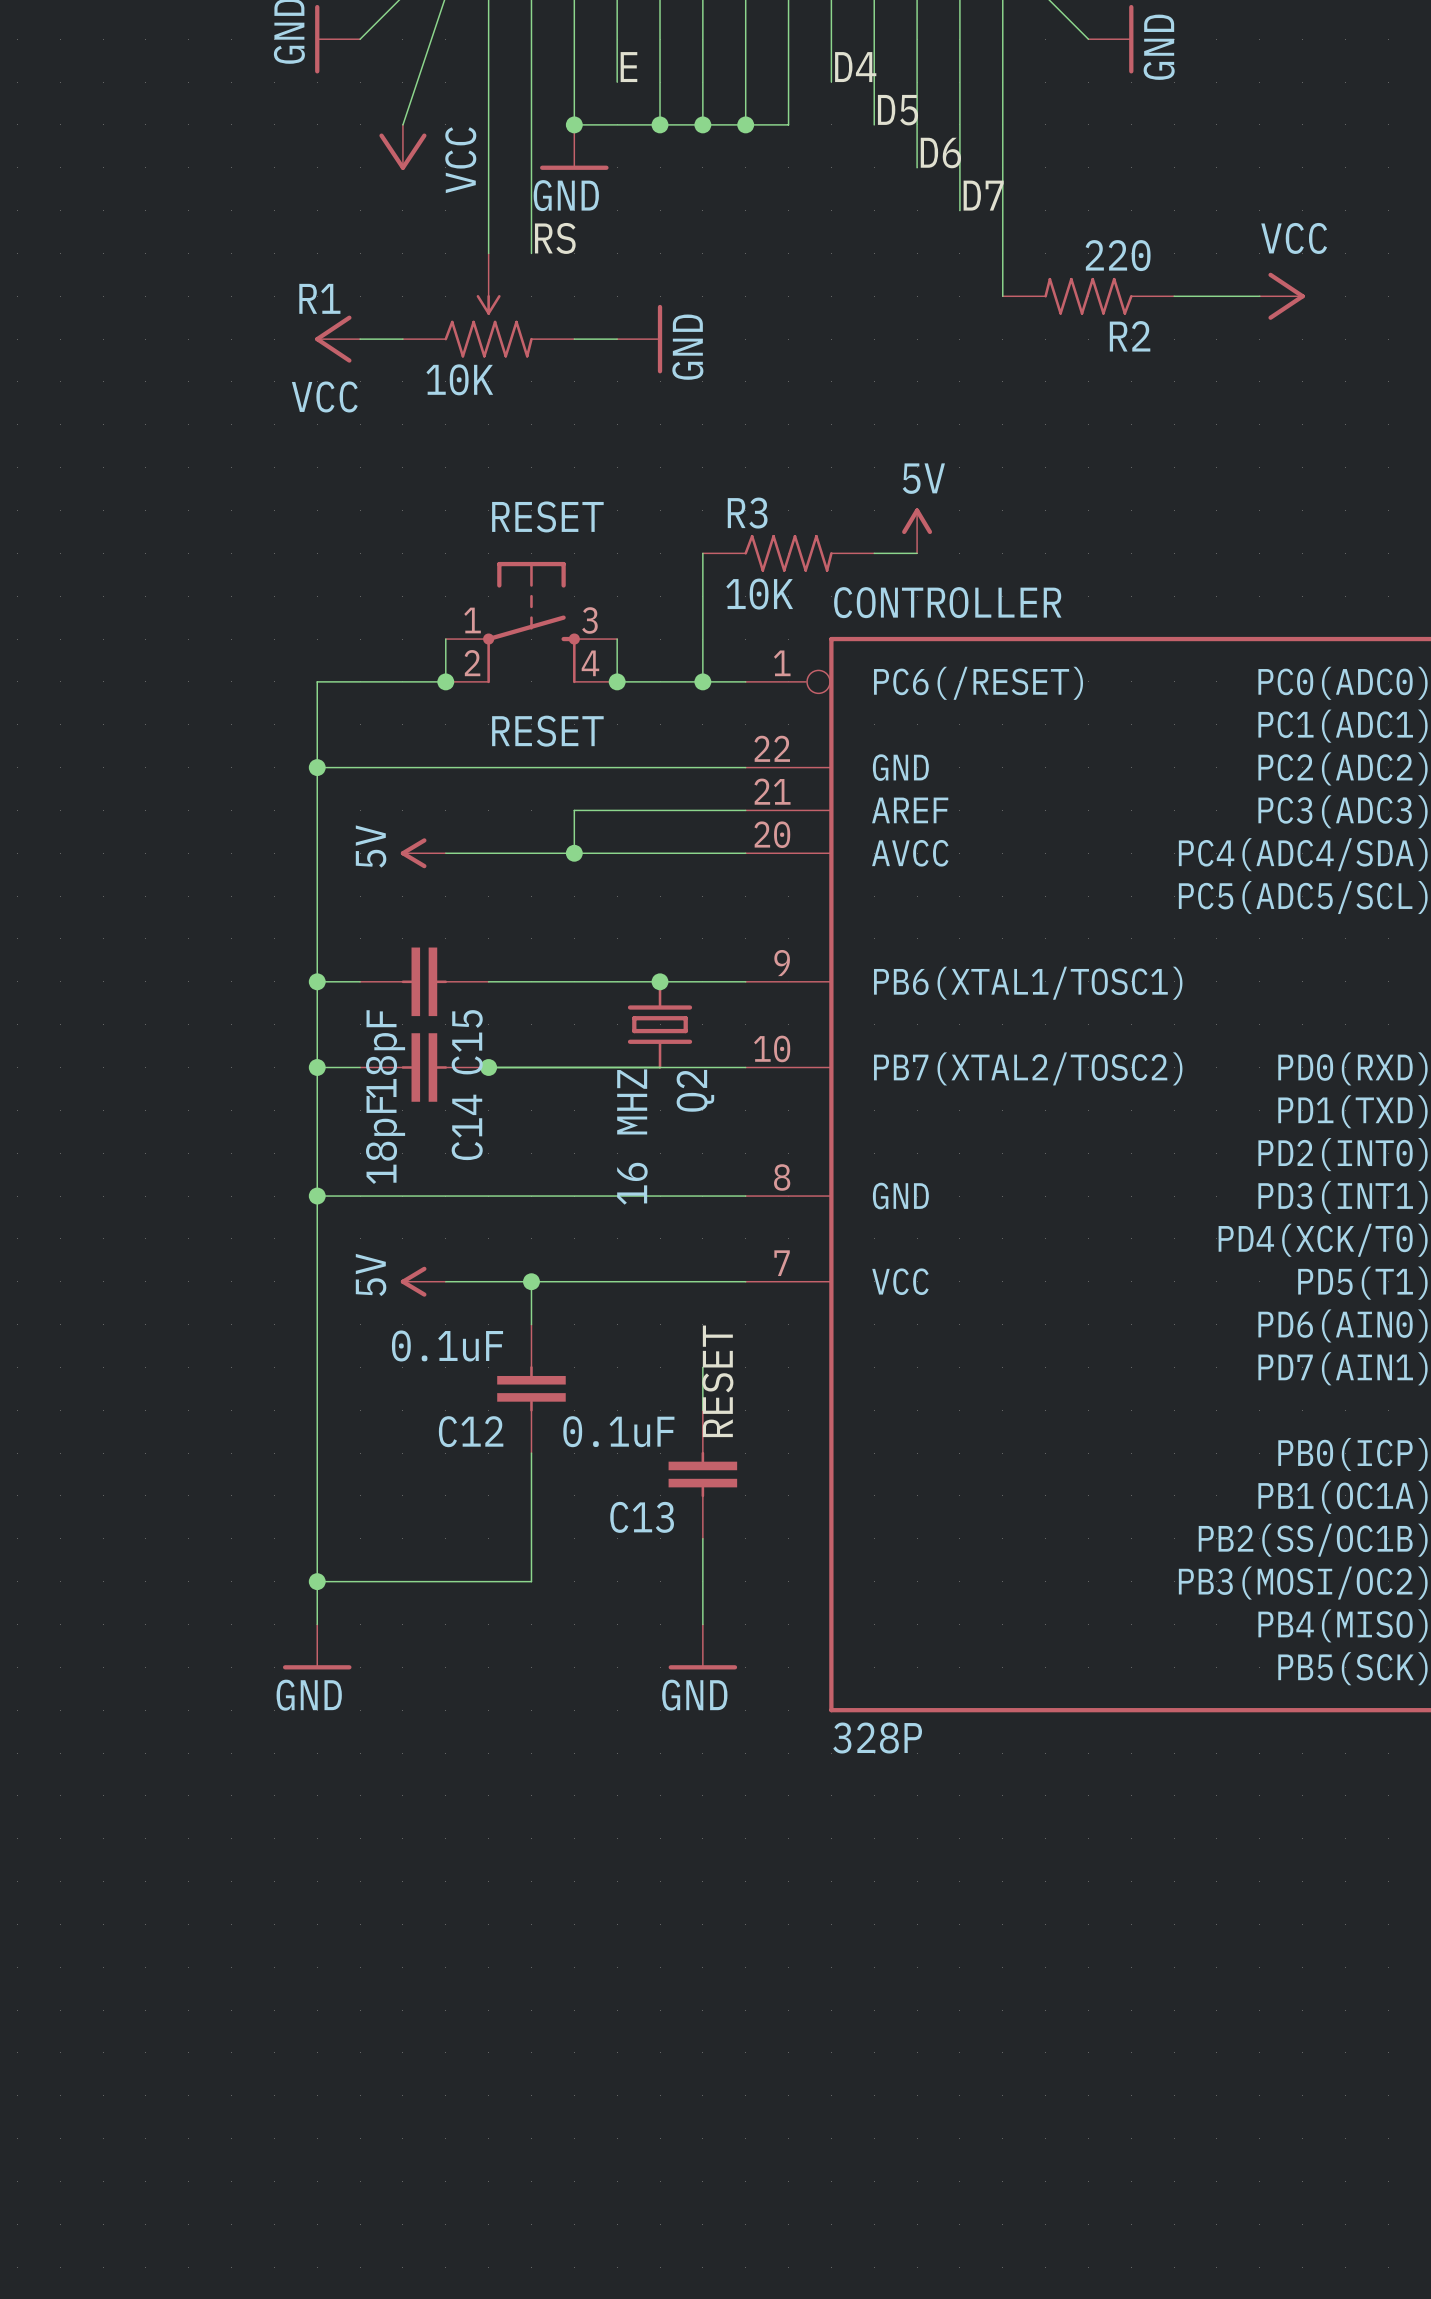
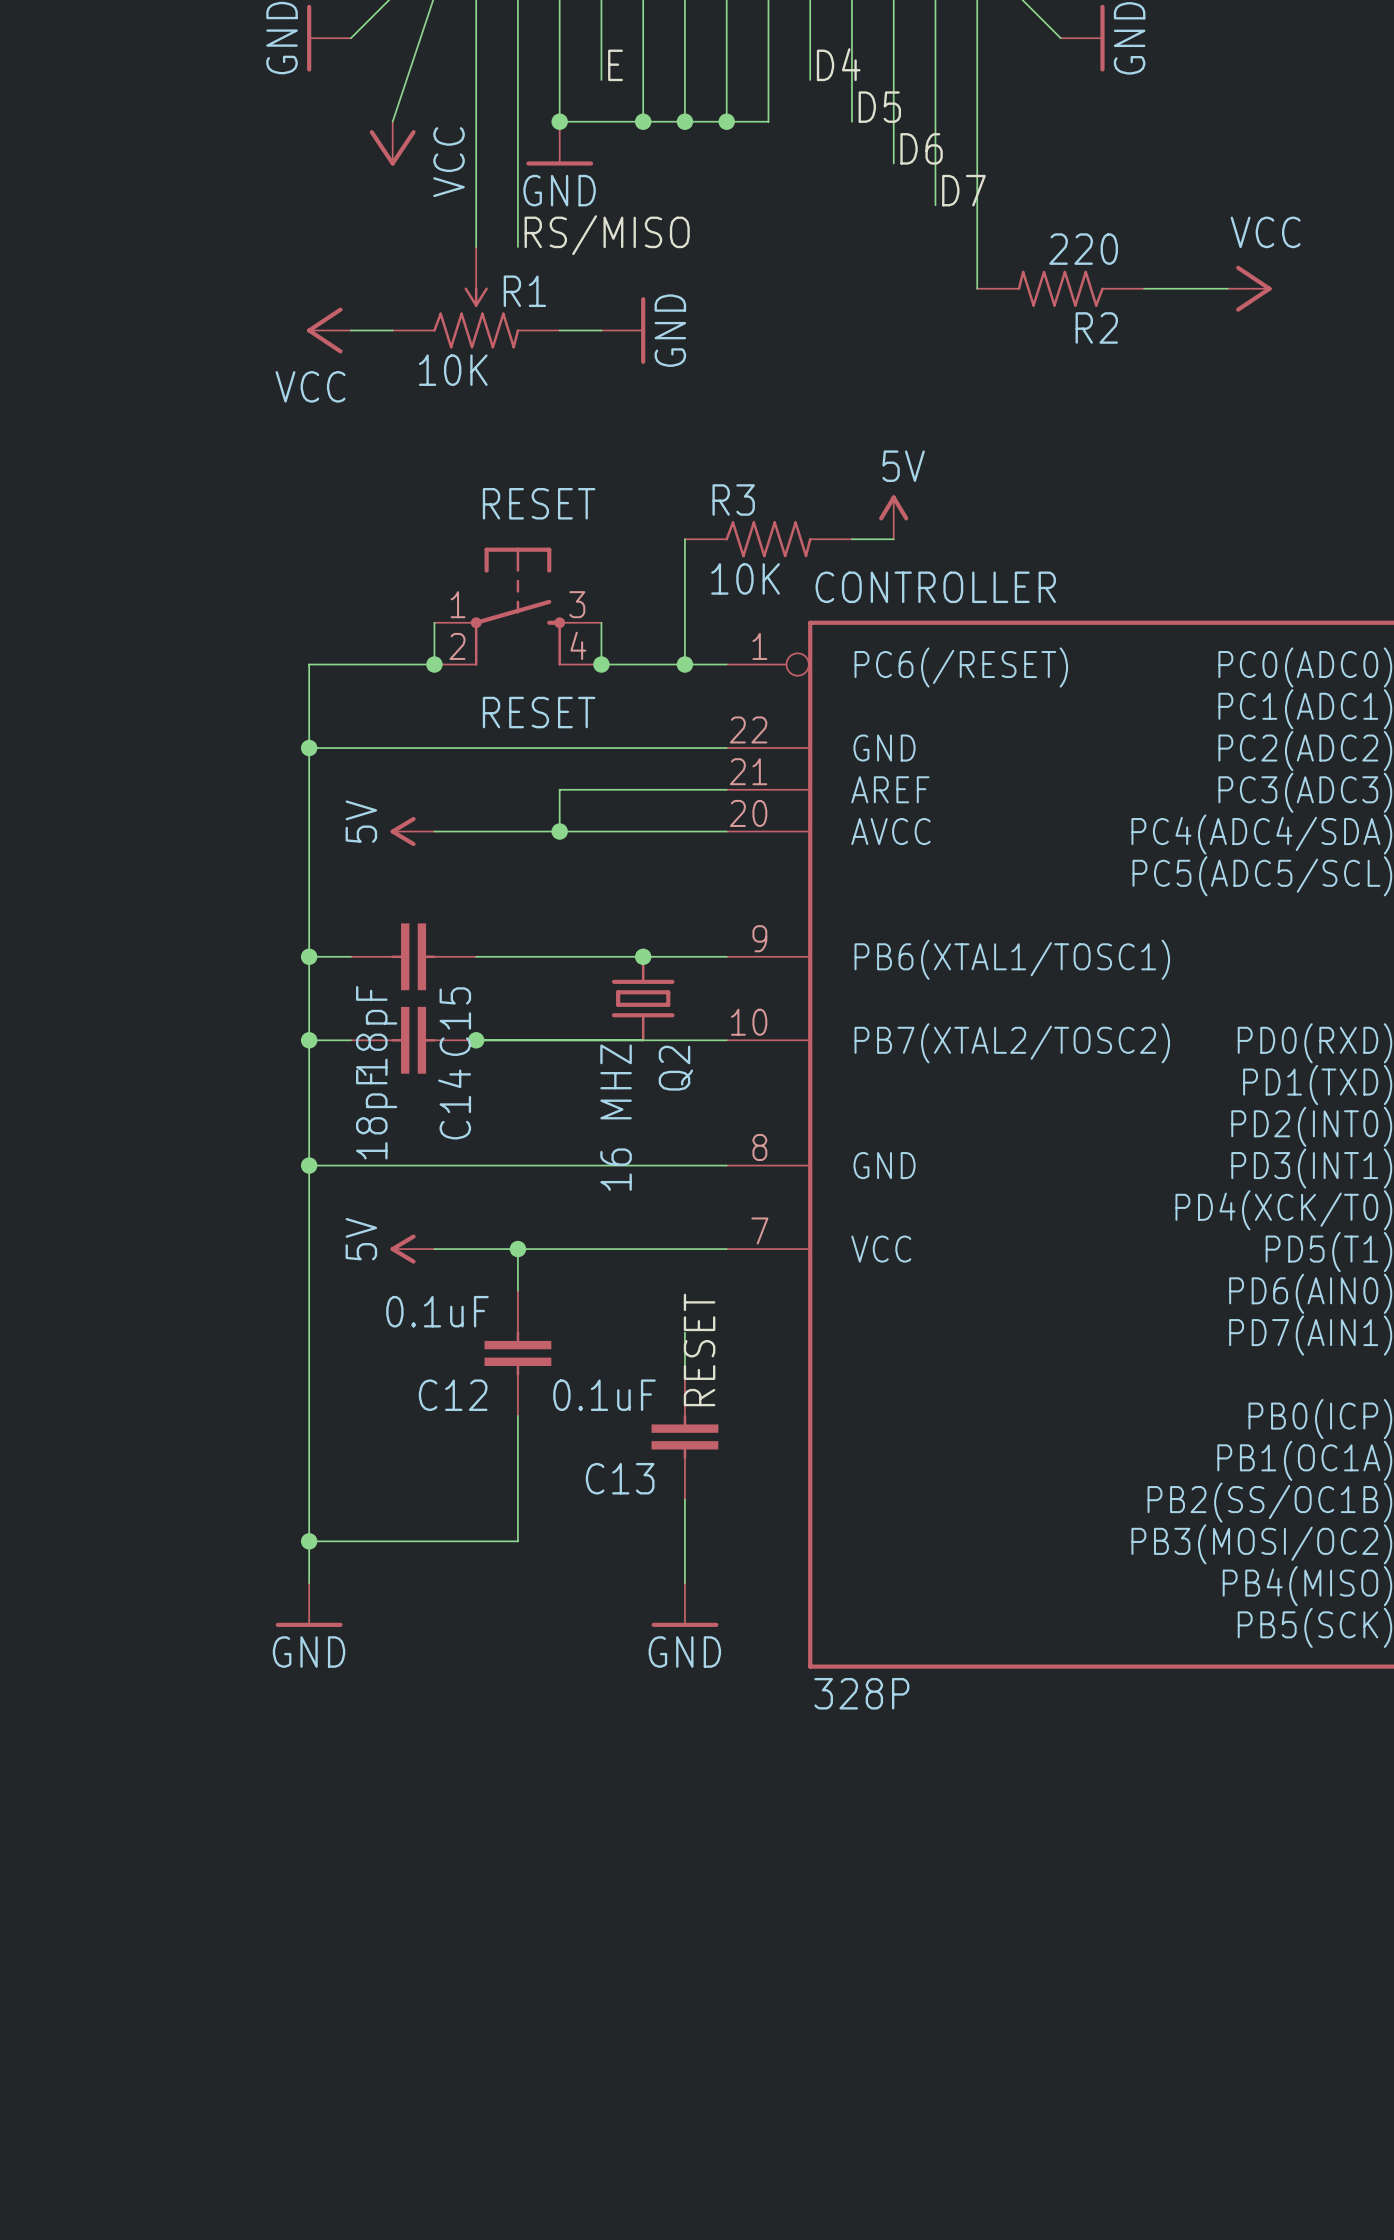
label: RS (555, 238) -> RS/MISO (607, 235)
R1 name position: R1 (319, 298) -> R1 (524, 291)

